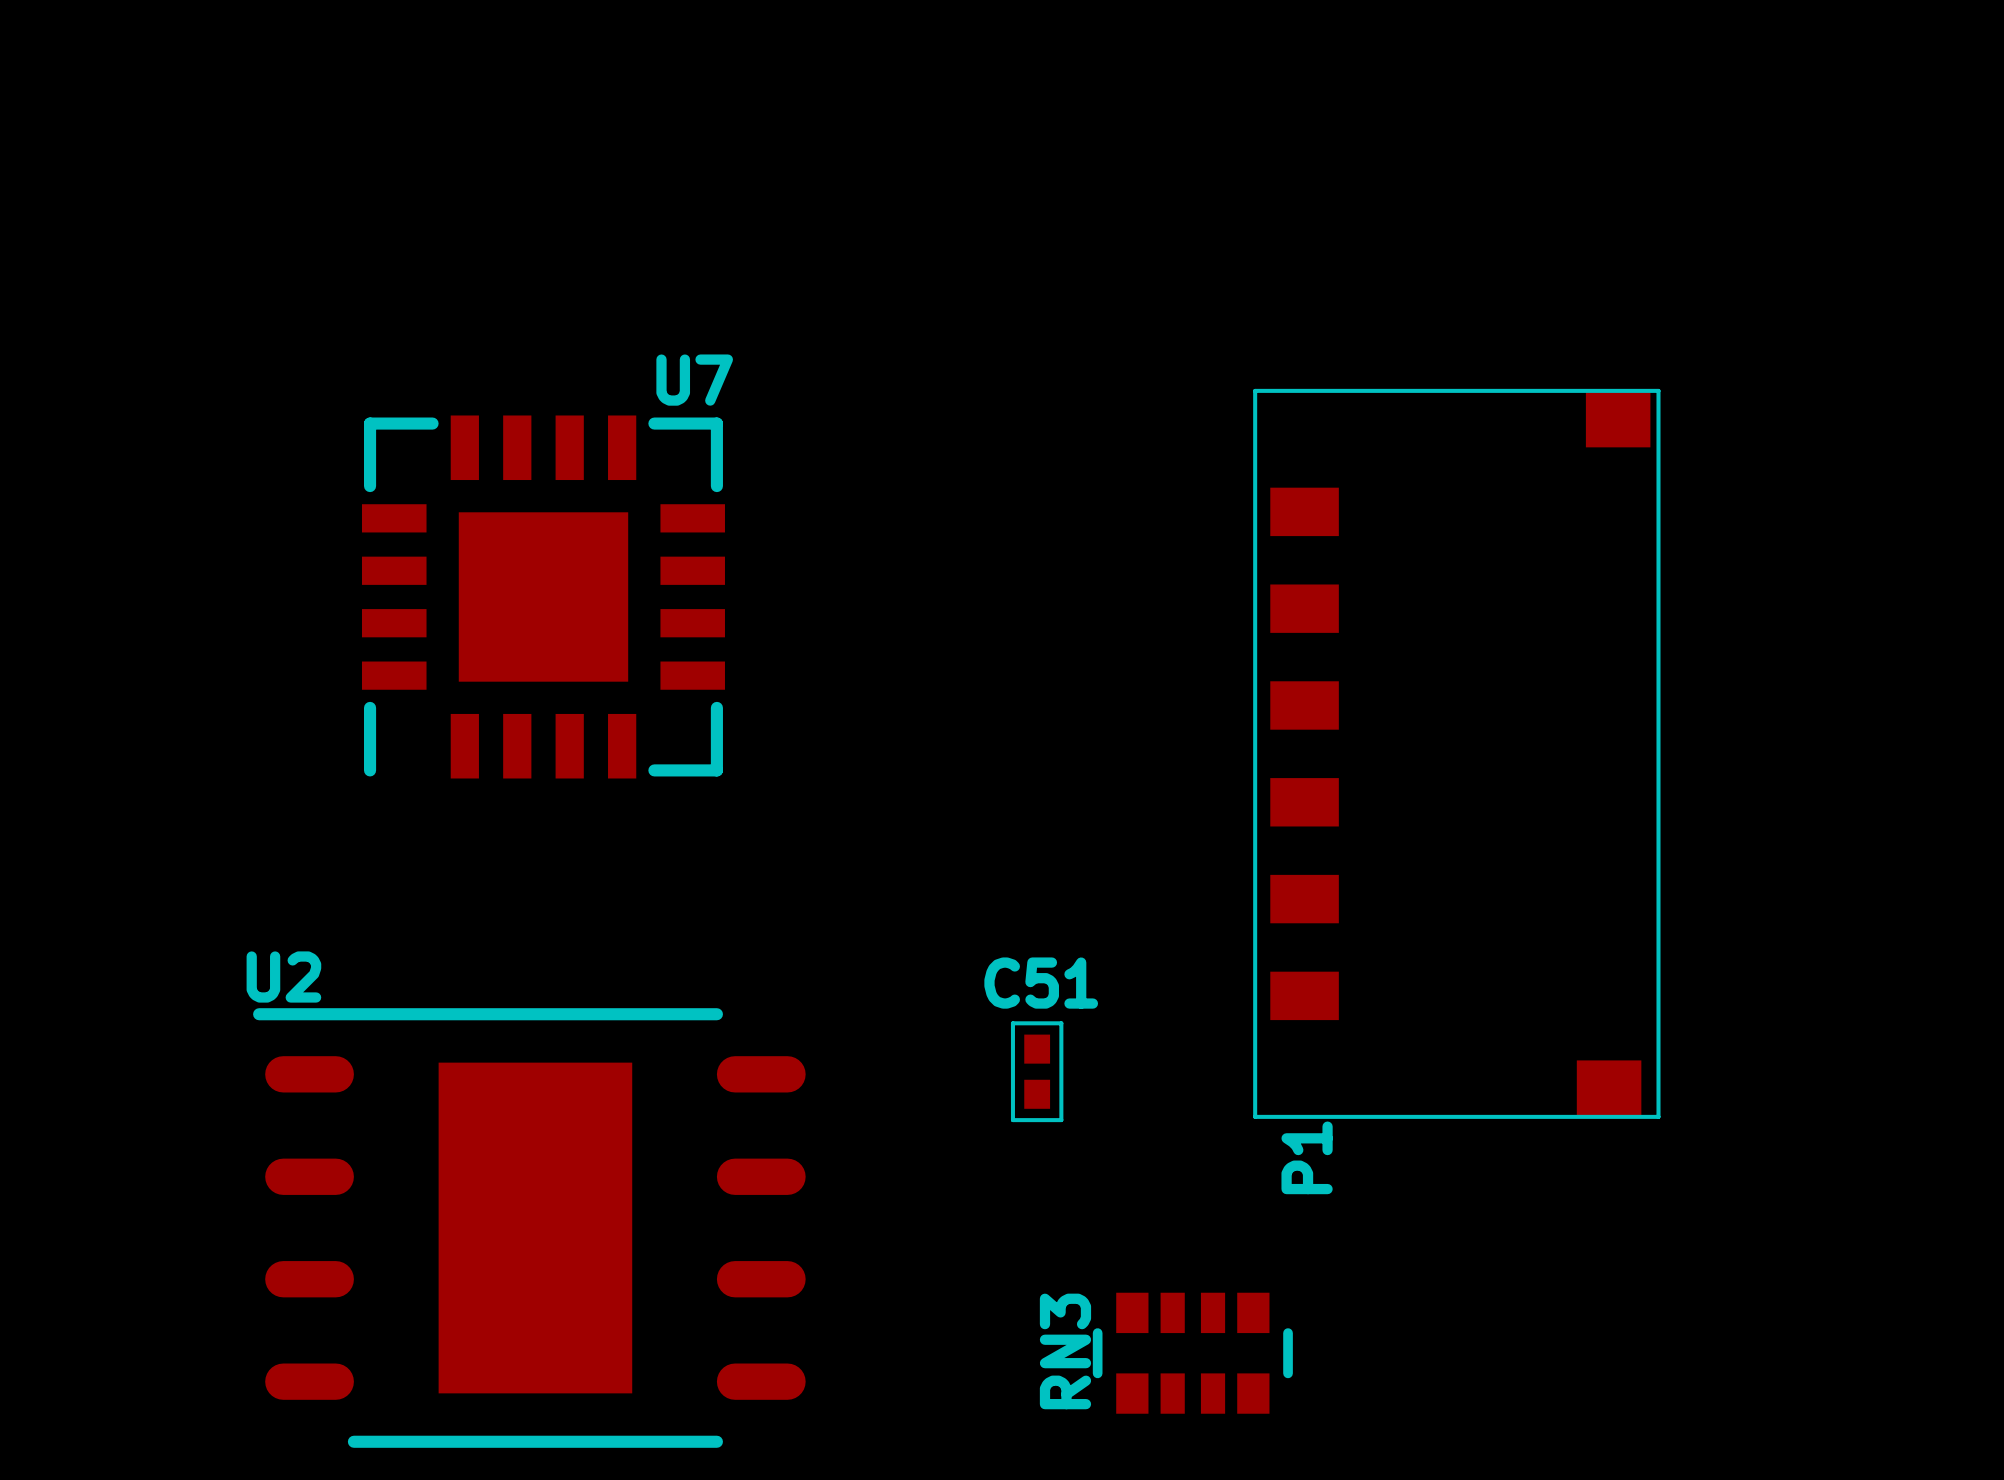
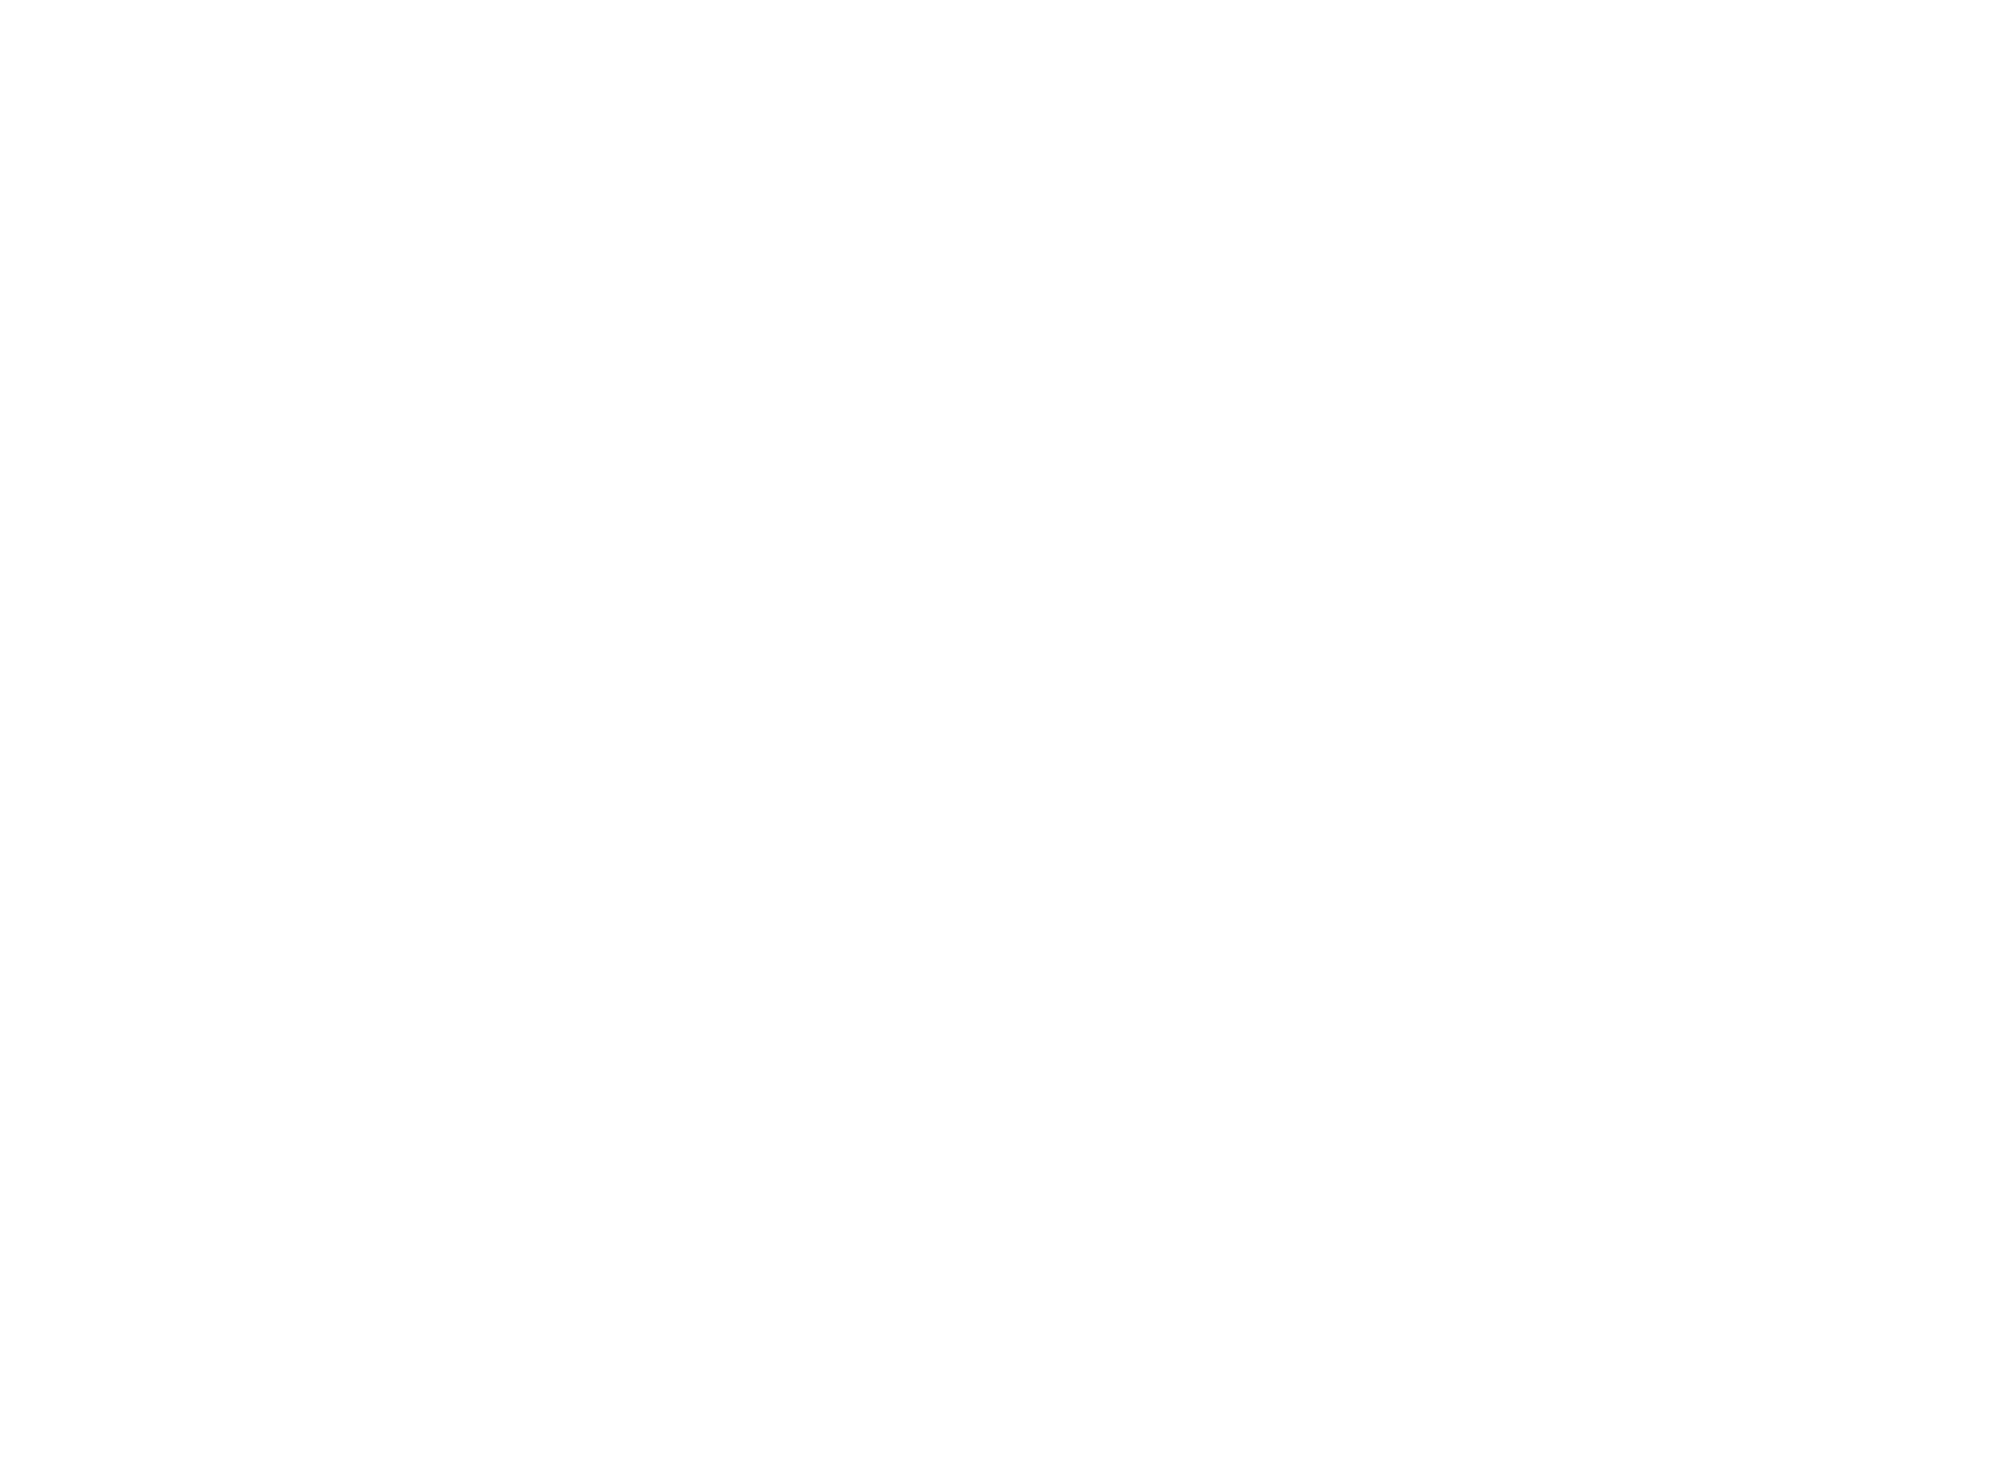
U7: (543, 596) -> none
P1: (1456, 753) -> none
C51: (1037, 1071) -> none
U2: (529, 1227) -> none
RN3: (1192, 1353) -> none

